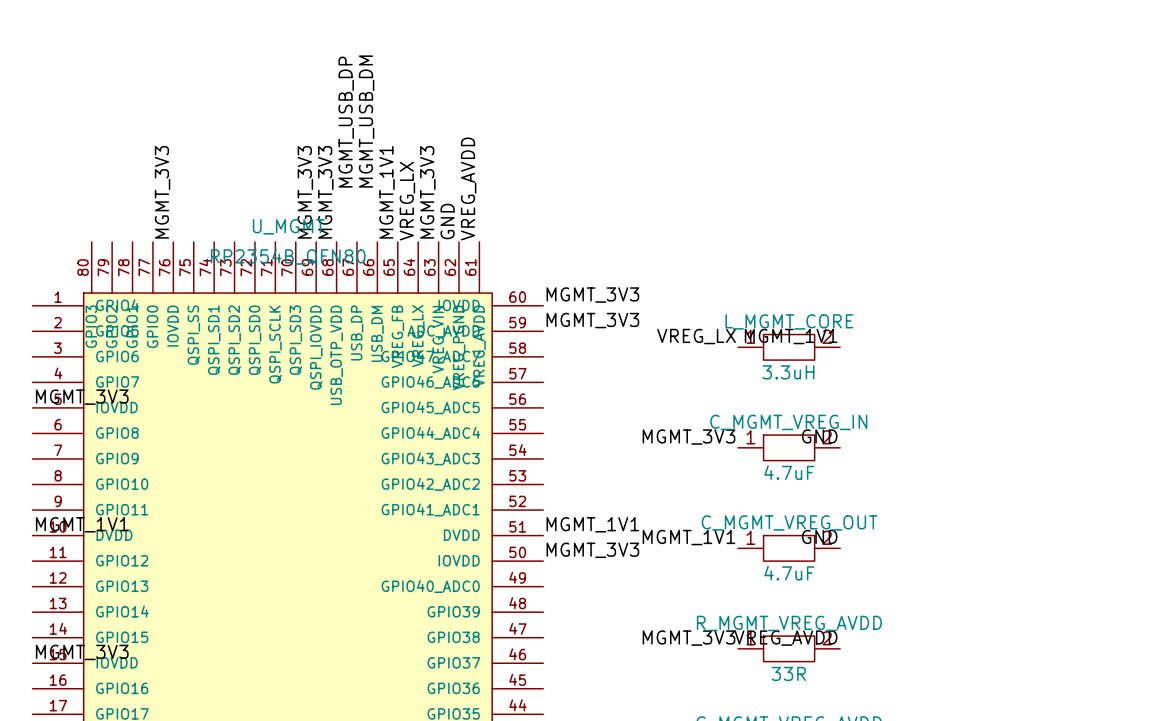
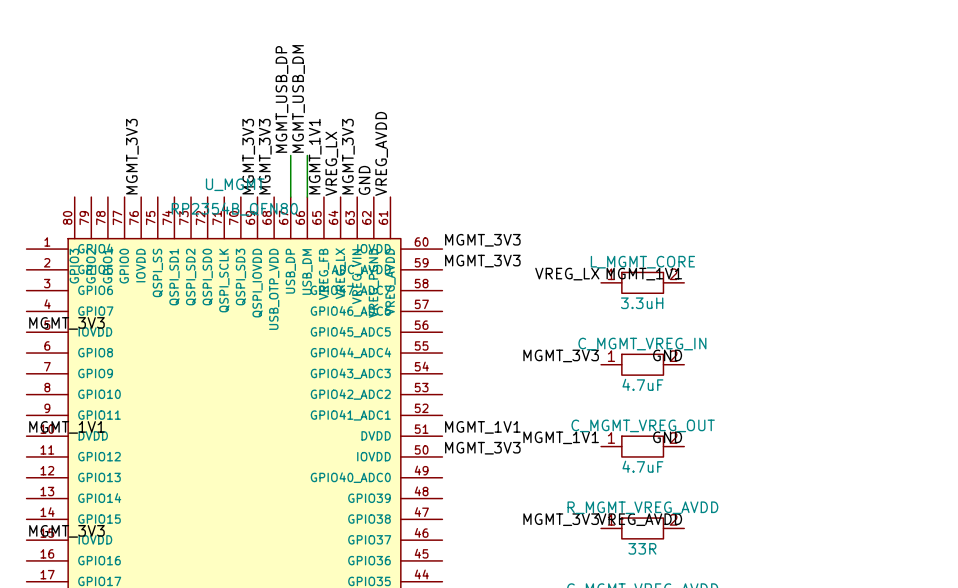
wire: none -> (290, 155) (290, 197)
wire: none -> (307, 155) (307, 197)

